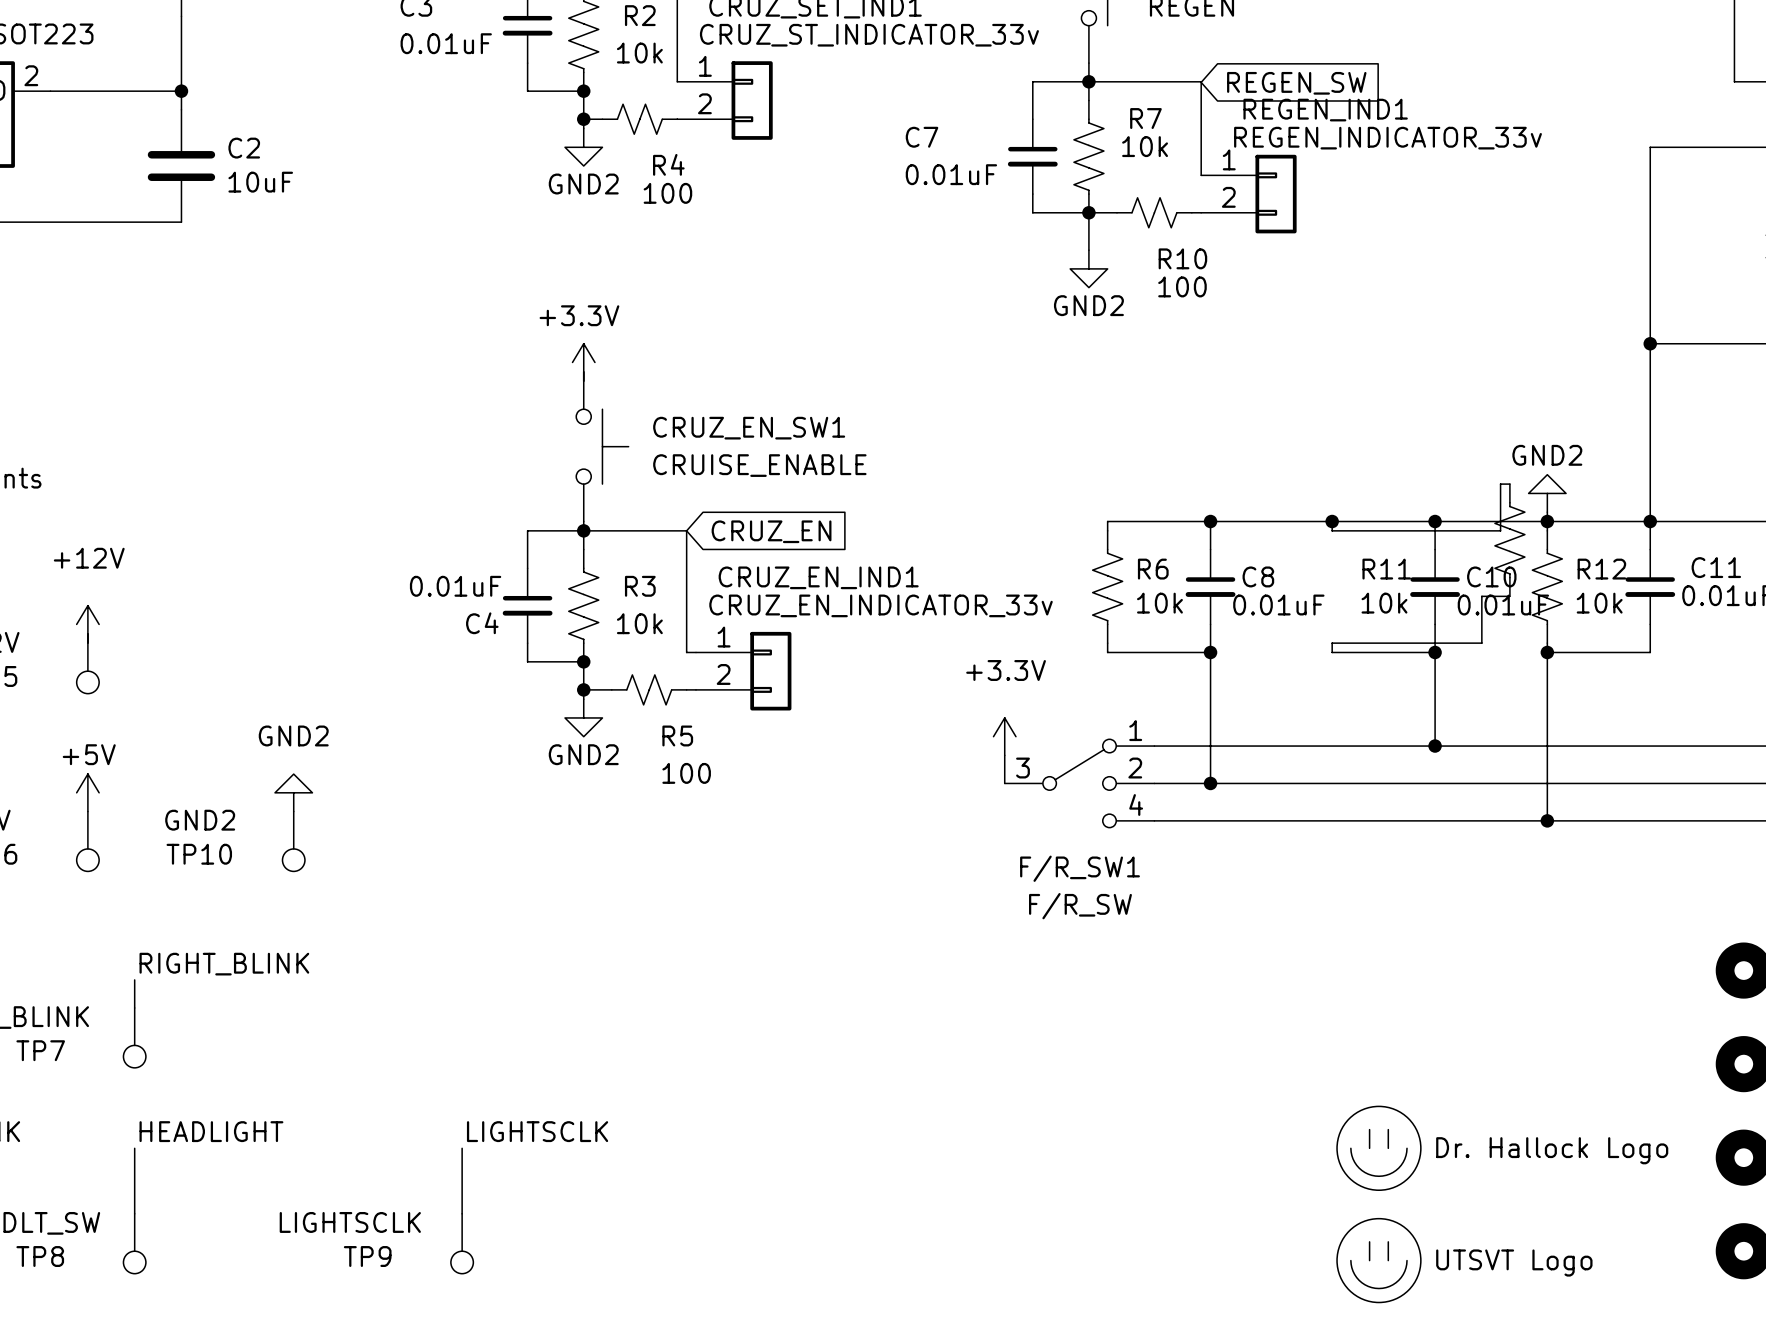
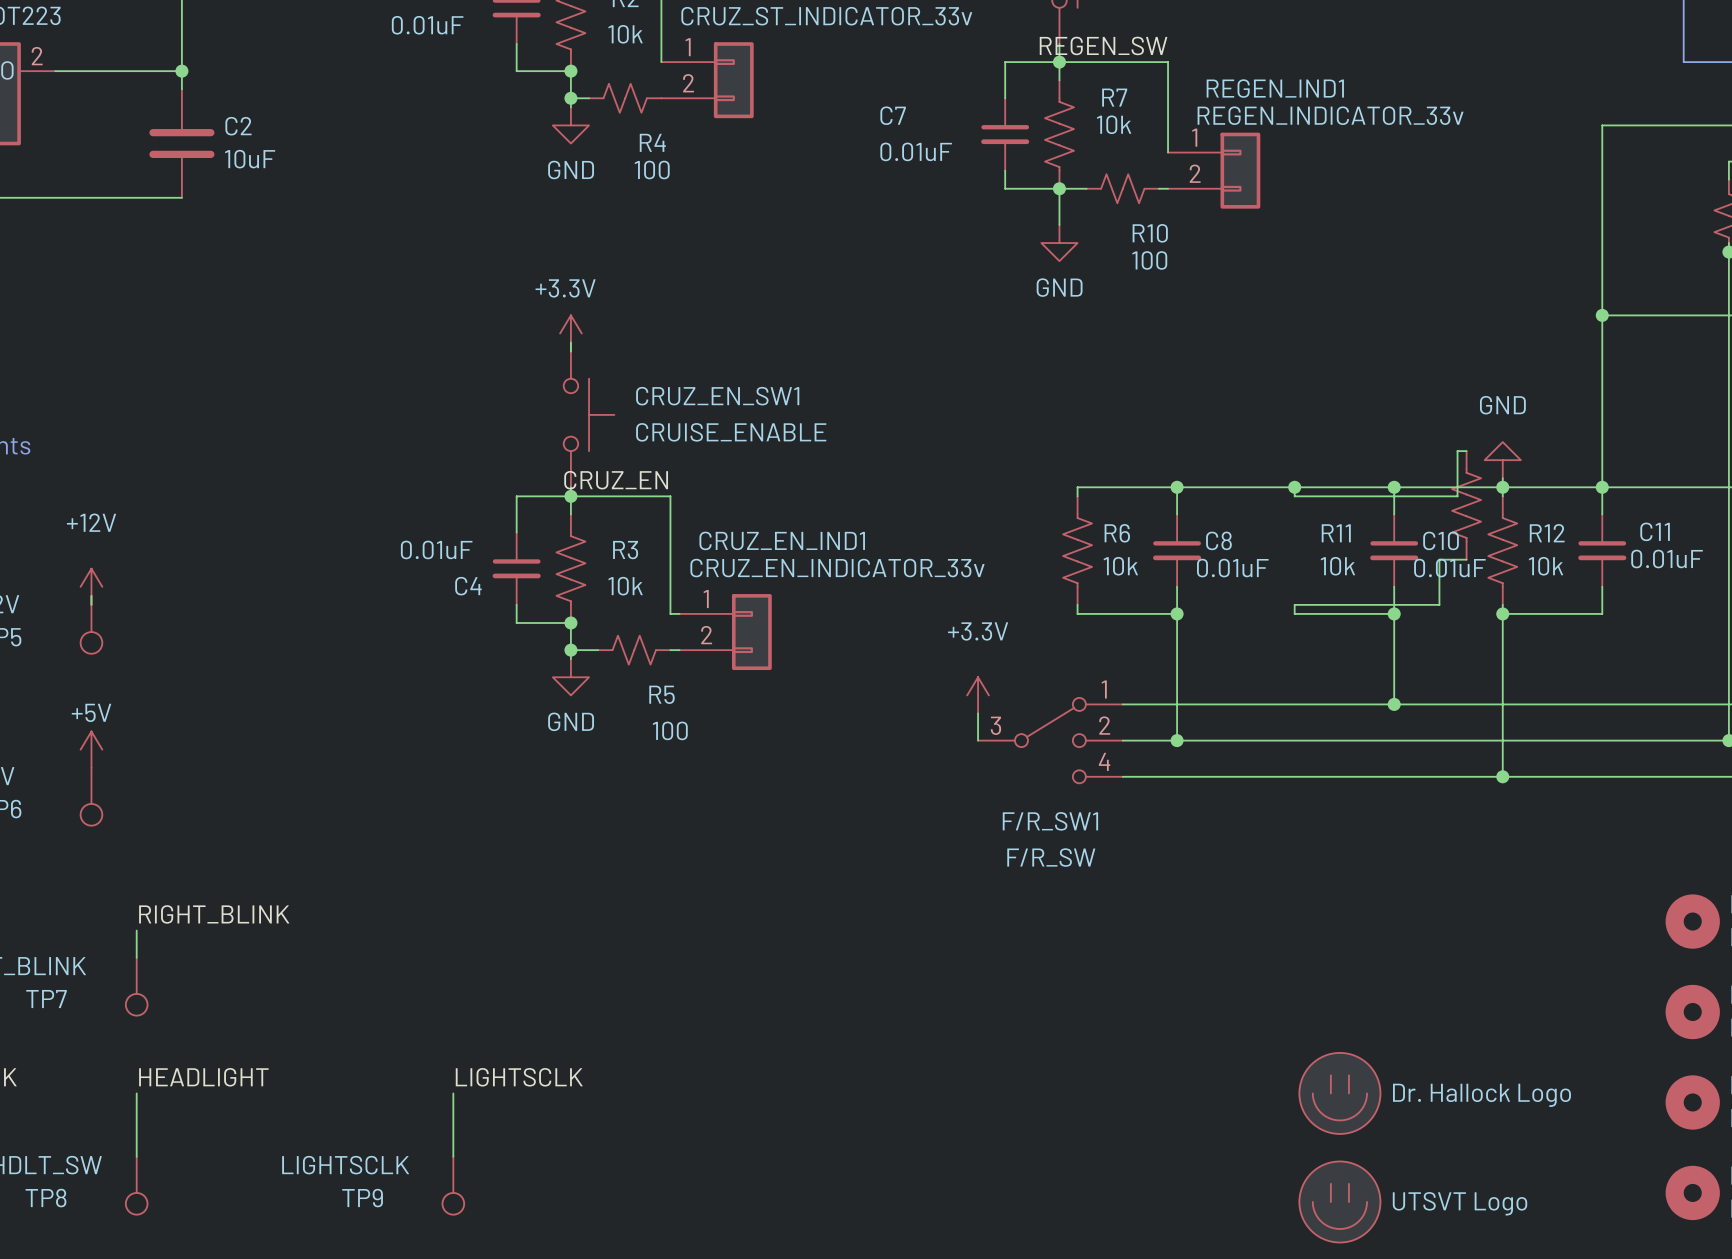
label: none -> REGEN_SW (1103, 45)
global label: REGEN_SW (1296, 83) -> none
power symbol: GND2 (583, 147) -> GND (570, 125)
power symbol: GND2 (1088, 268) -> GND (1059, 243)
power symbol: GND2 (1547, 493) -> GND (1502, 460)
label: none -> CRUZ_EN (616, 480)
global label: CRUZ_EN (771, 531) -> none
power symbol: GND2 (583, 717) -> GND (570, 677)
power symbol: GND2 (293, 792) -> none
TP10: GND2 (293, 841) -> none

